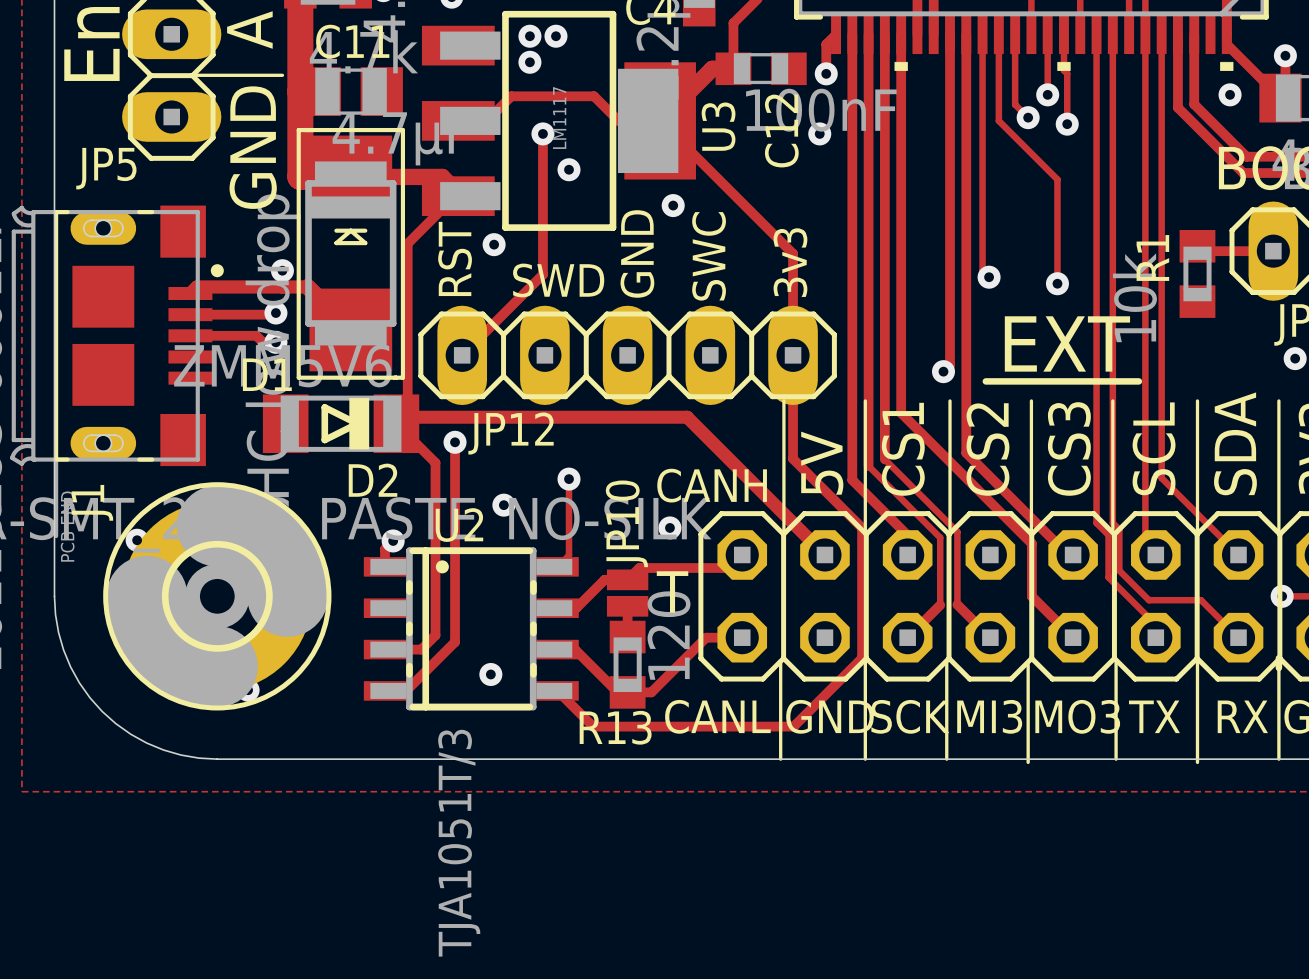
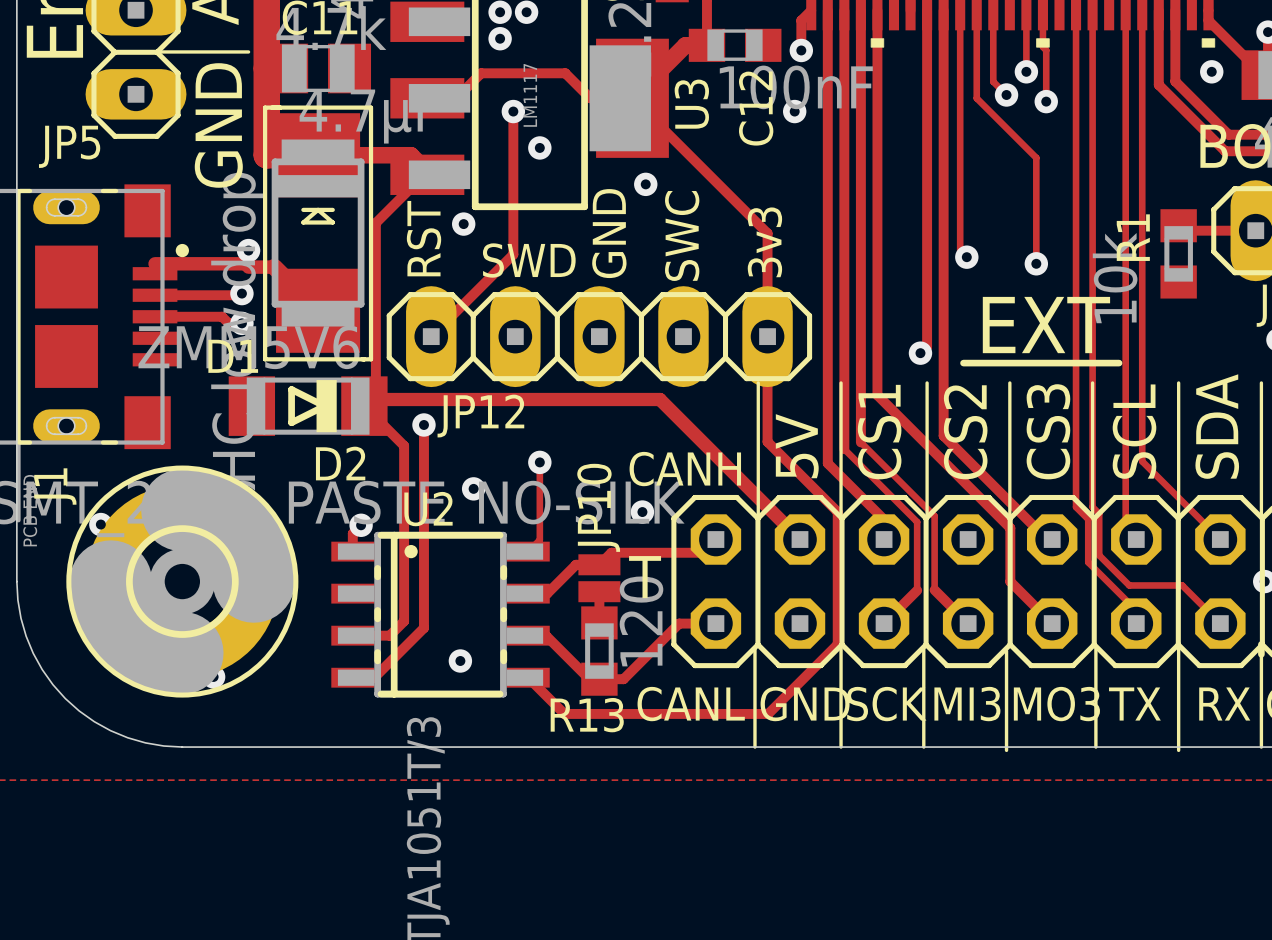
track: none -> (155, 263) (248, 263)
track: (282, 286) (196, 286) (190, 293) -> none

